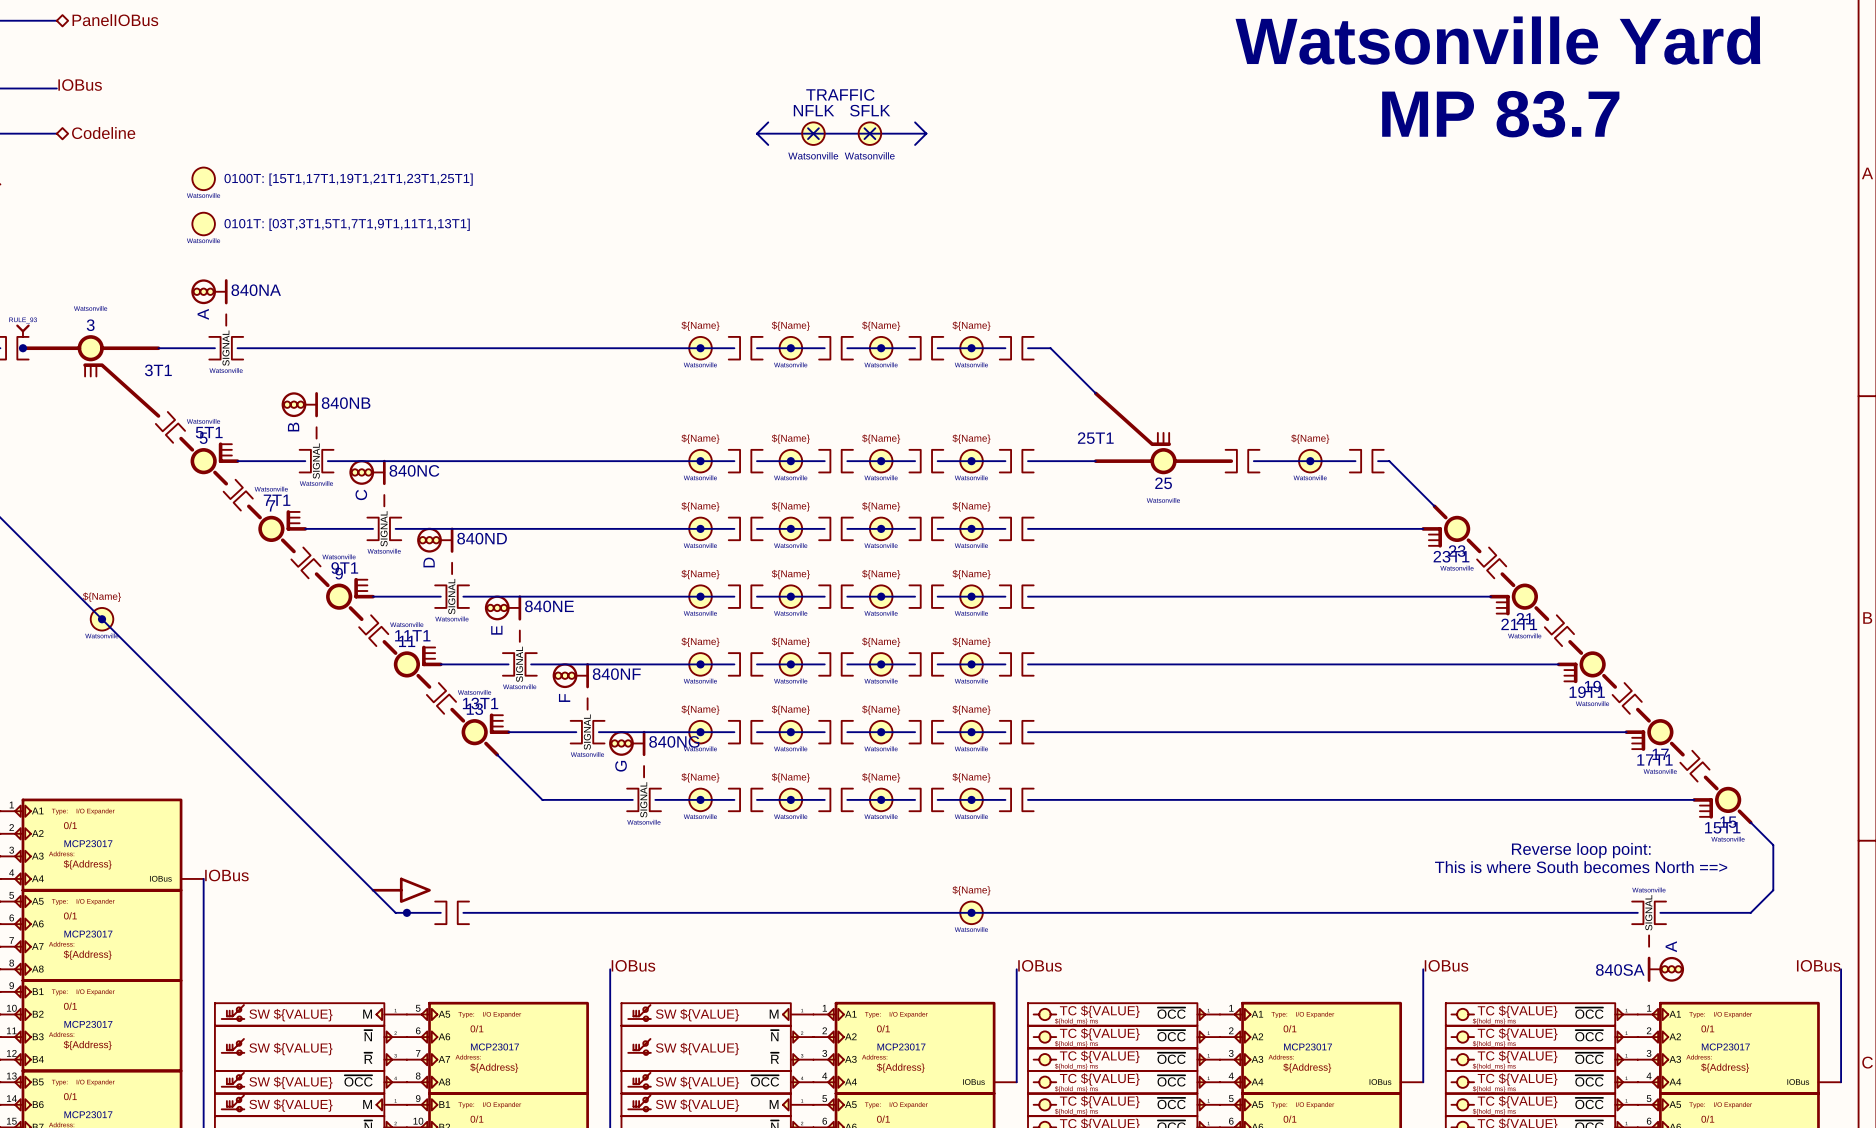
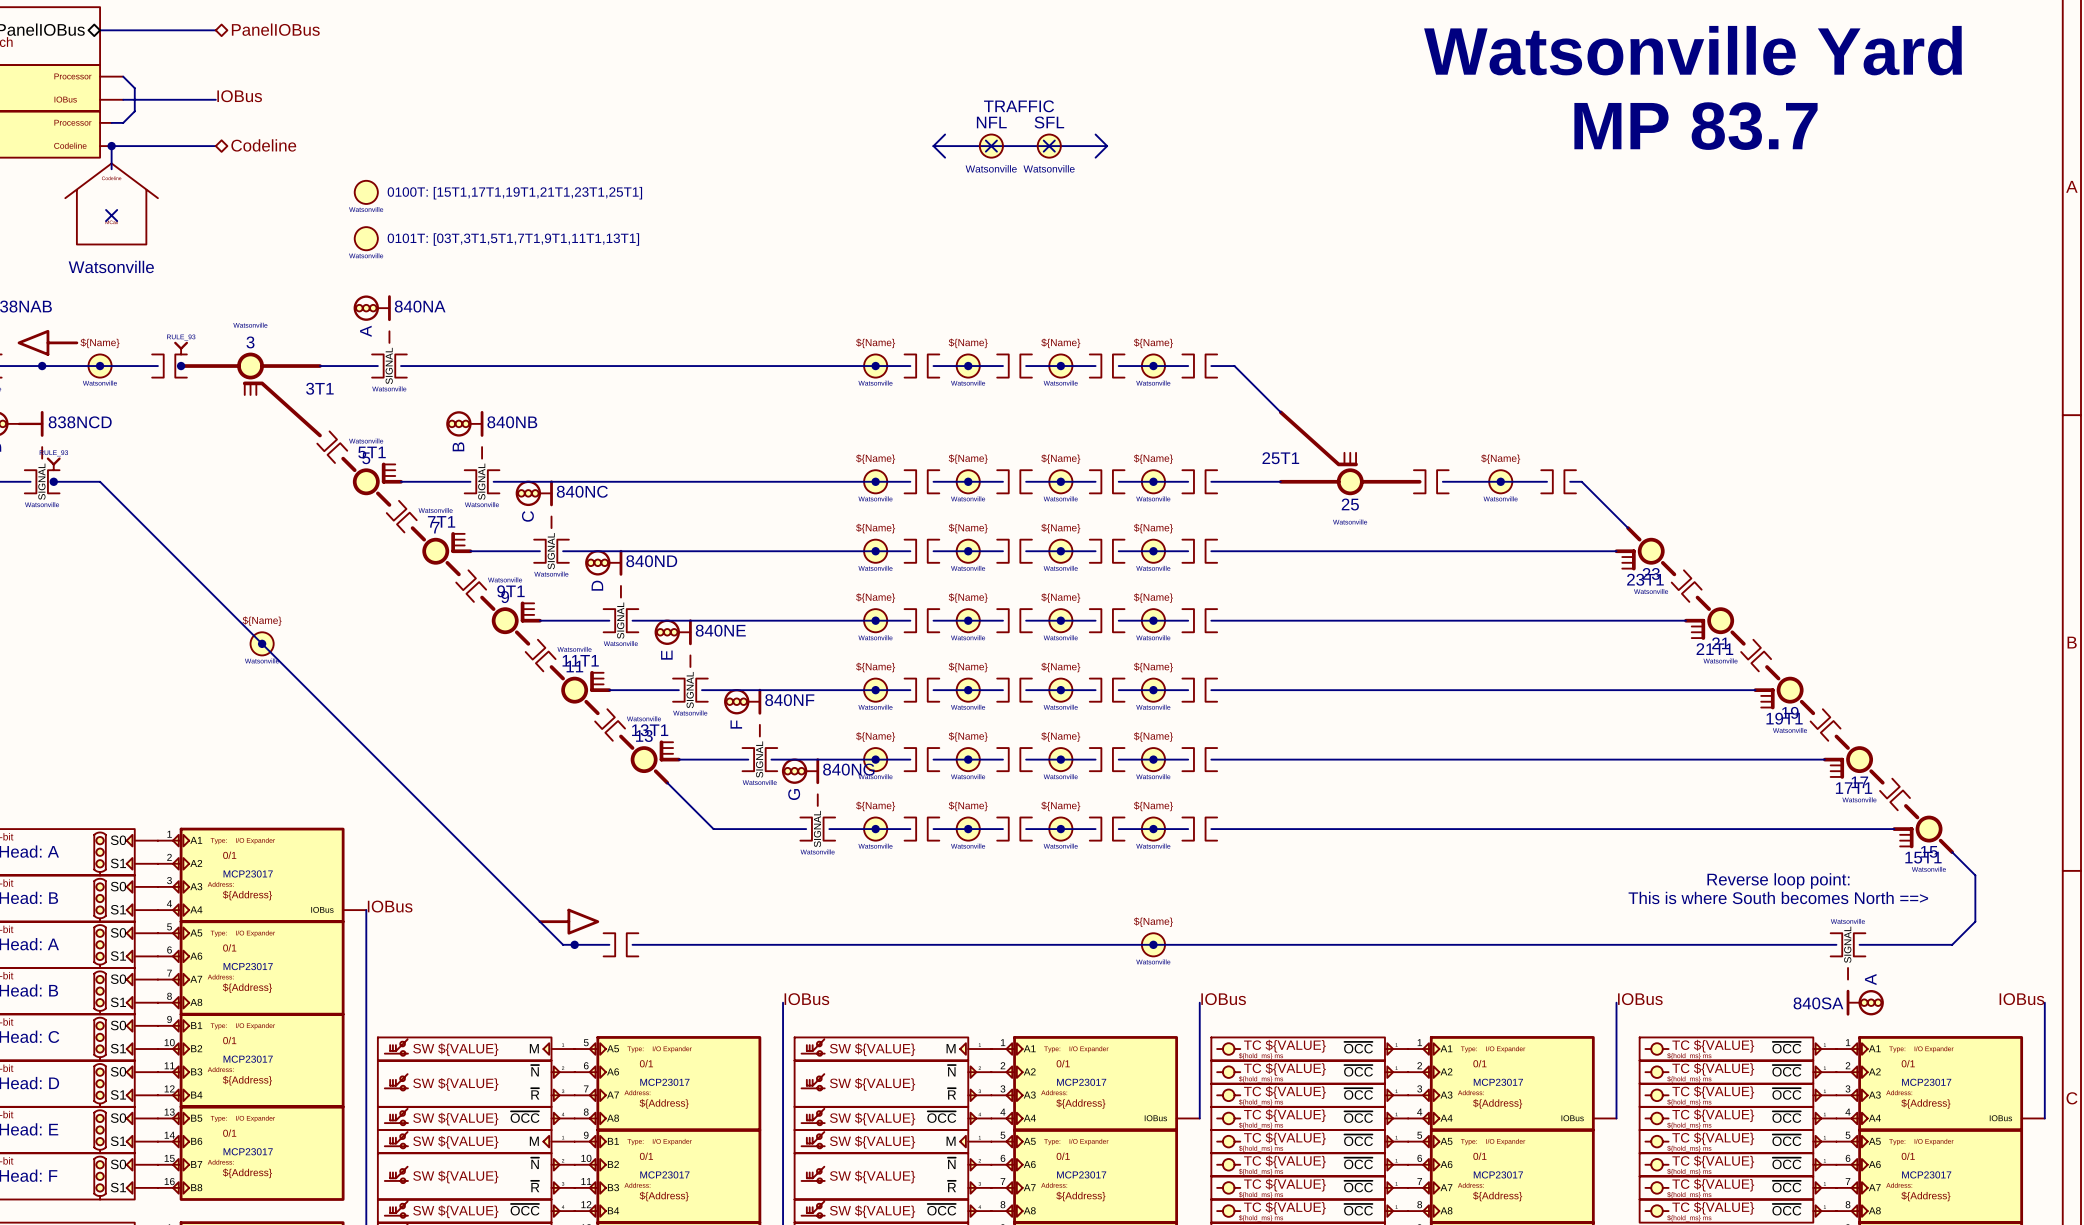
part value: NFLK (814, 110) -> NFL (991, 122)
part value: SFLK (870, 110) -> SFL (1049, 122)

